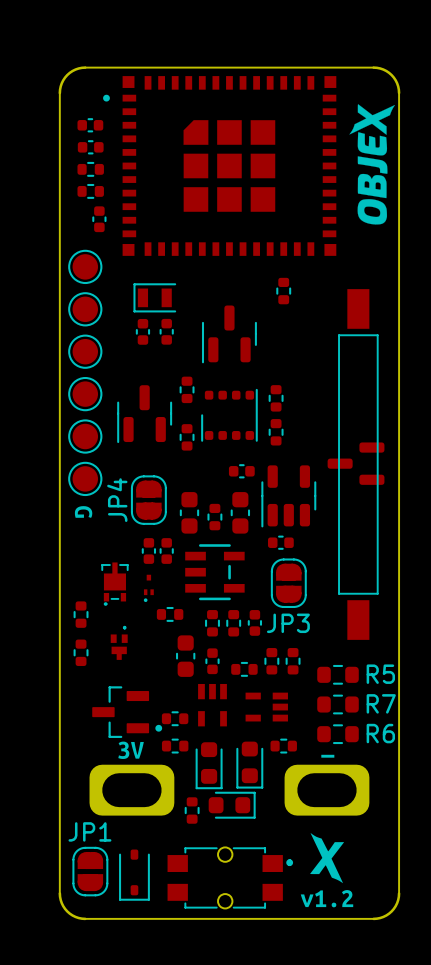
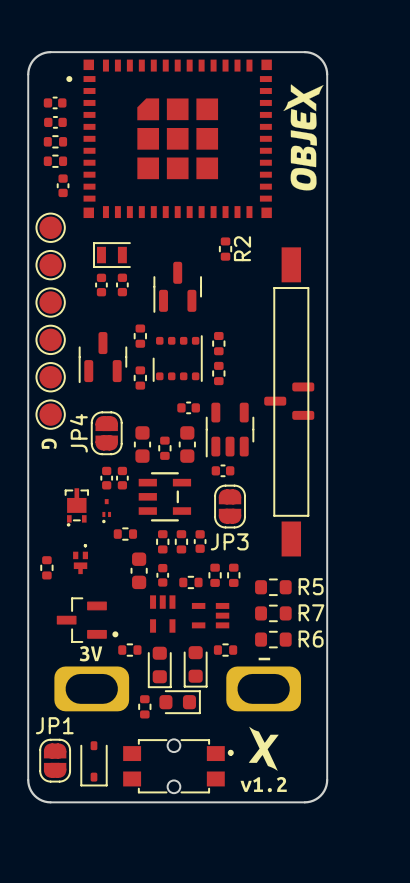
R2 name: none -> R2 (242, 248)
part: (81, 614) -> none
part: (175, 718) -> none

